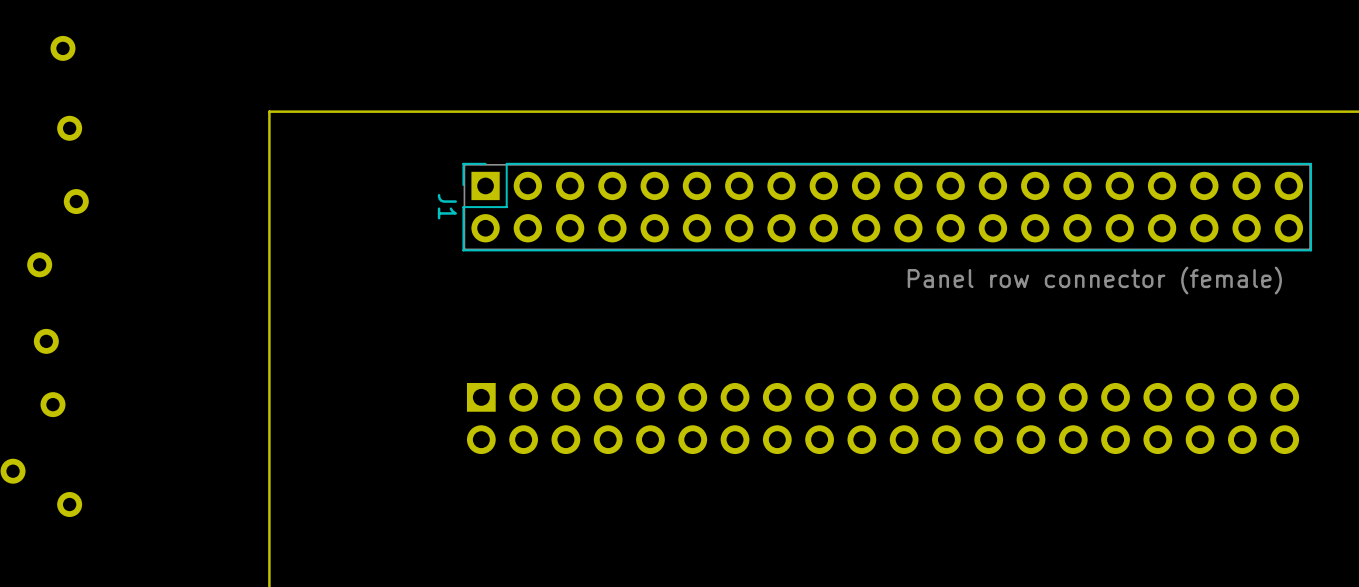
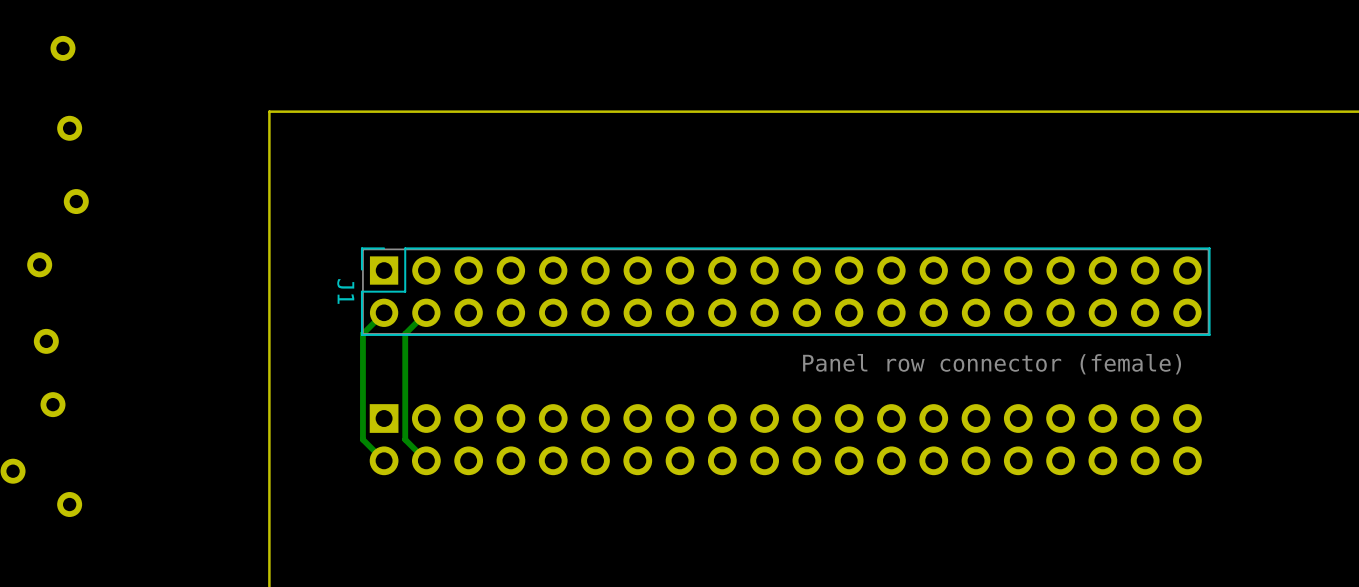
J1 position: (887, 207) -> (785, 291)
track: none -> (384, 312) (362, 333) (362, 439) (384, 460)
track: none -> (426, 312) (405, 333) (405, 439) (426, 460)
part position: (883, 418) -> (785, 439)

